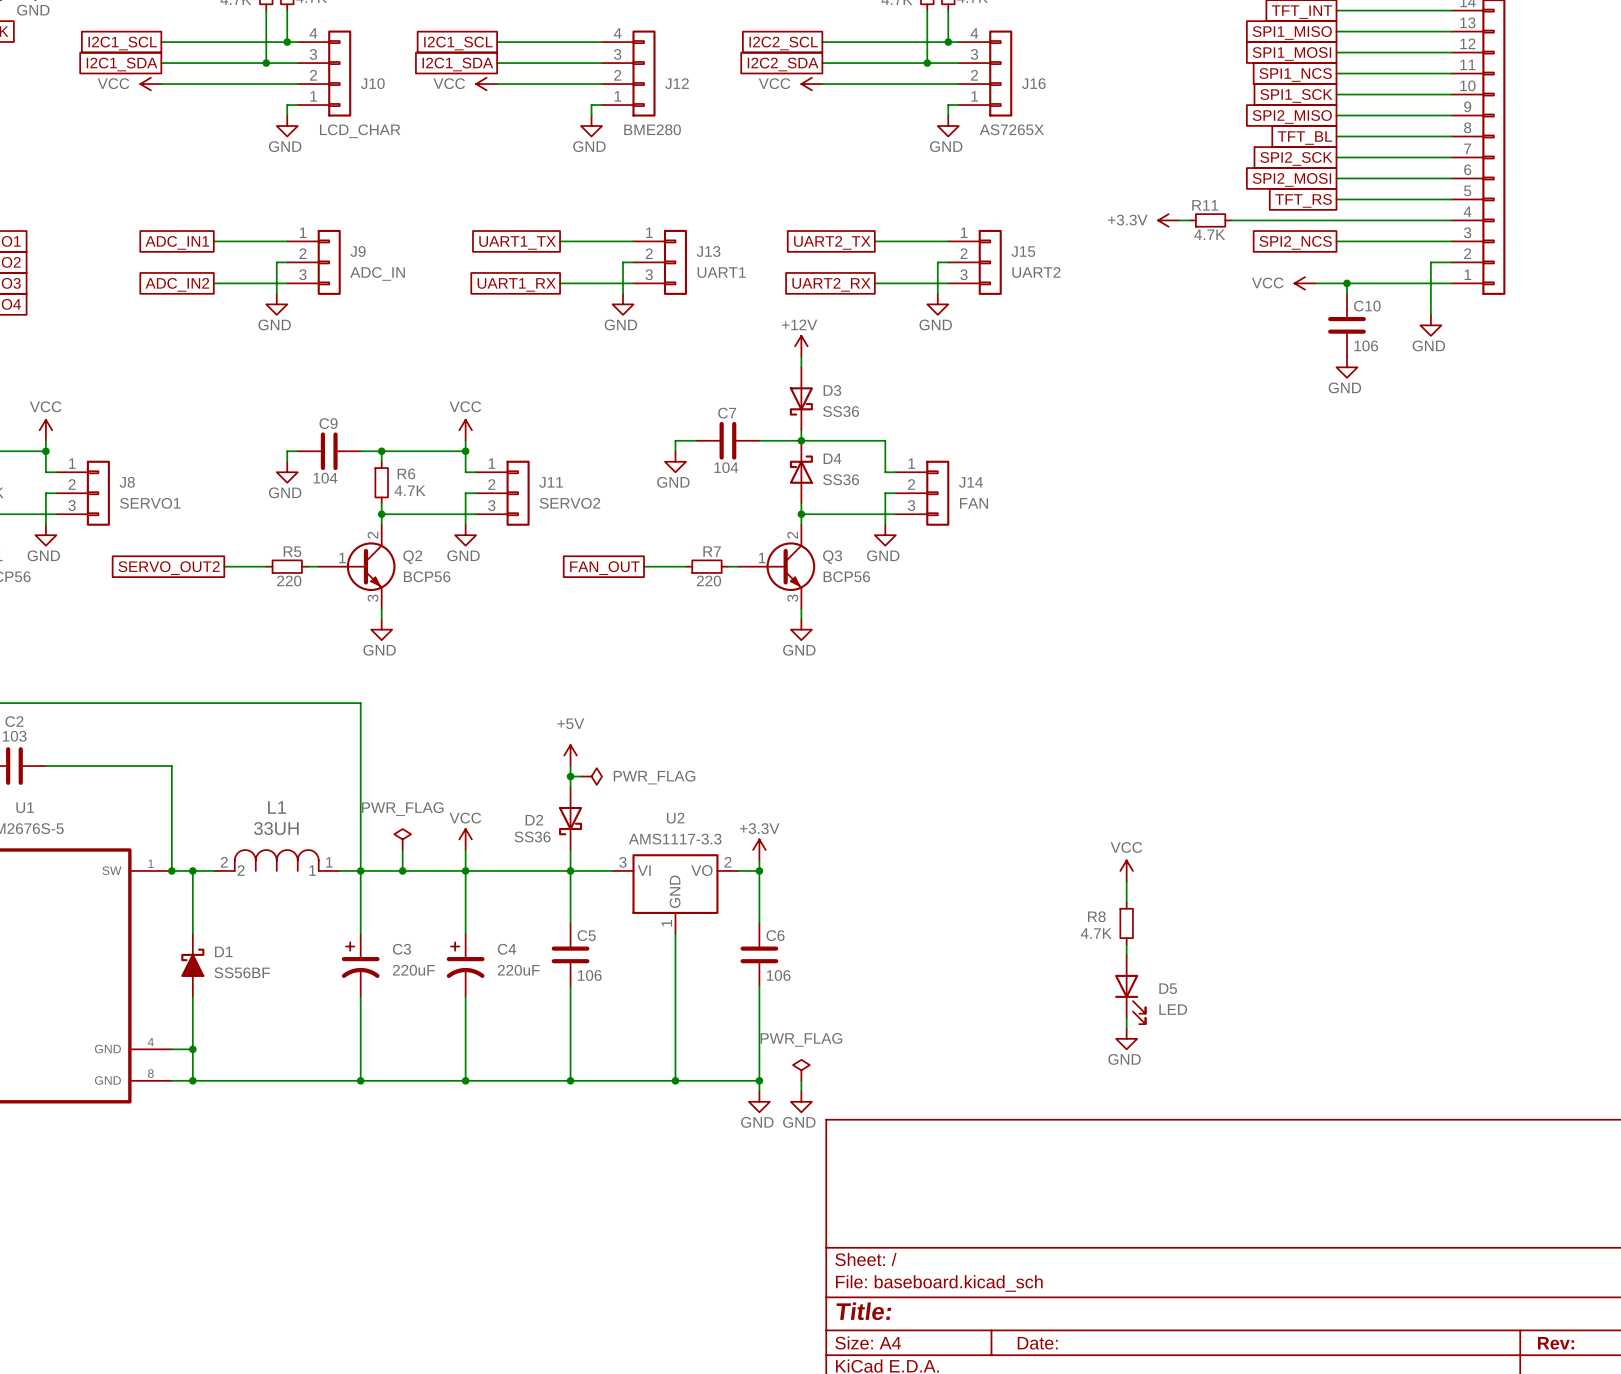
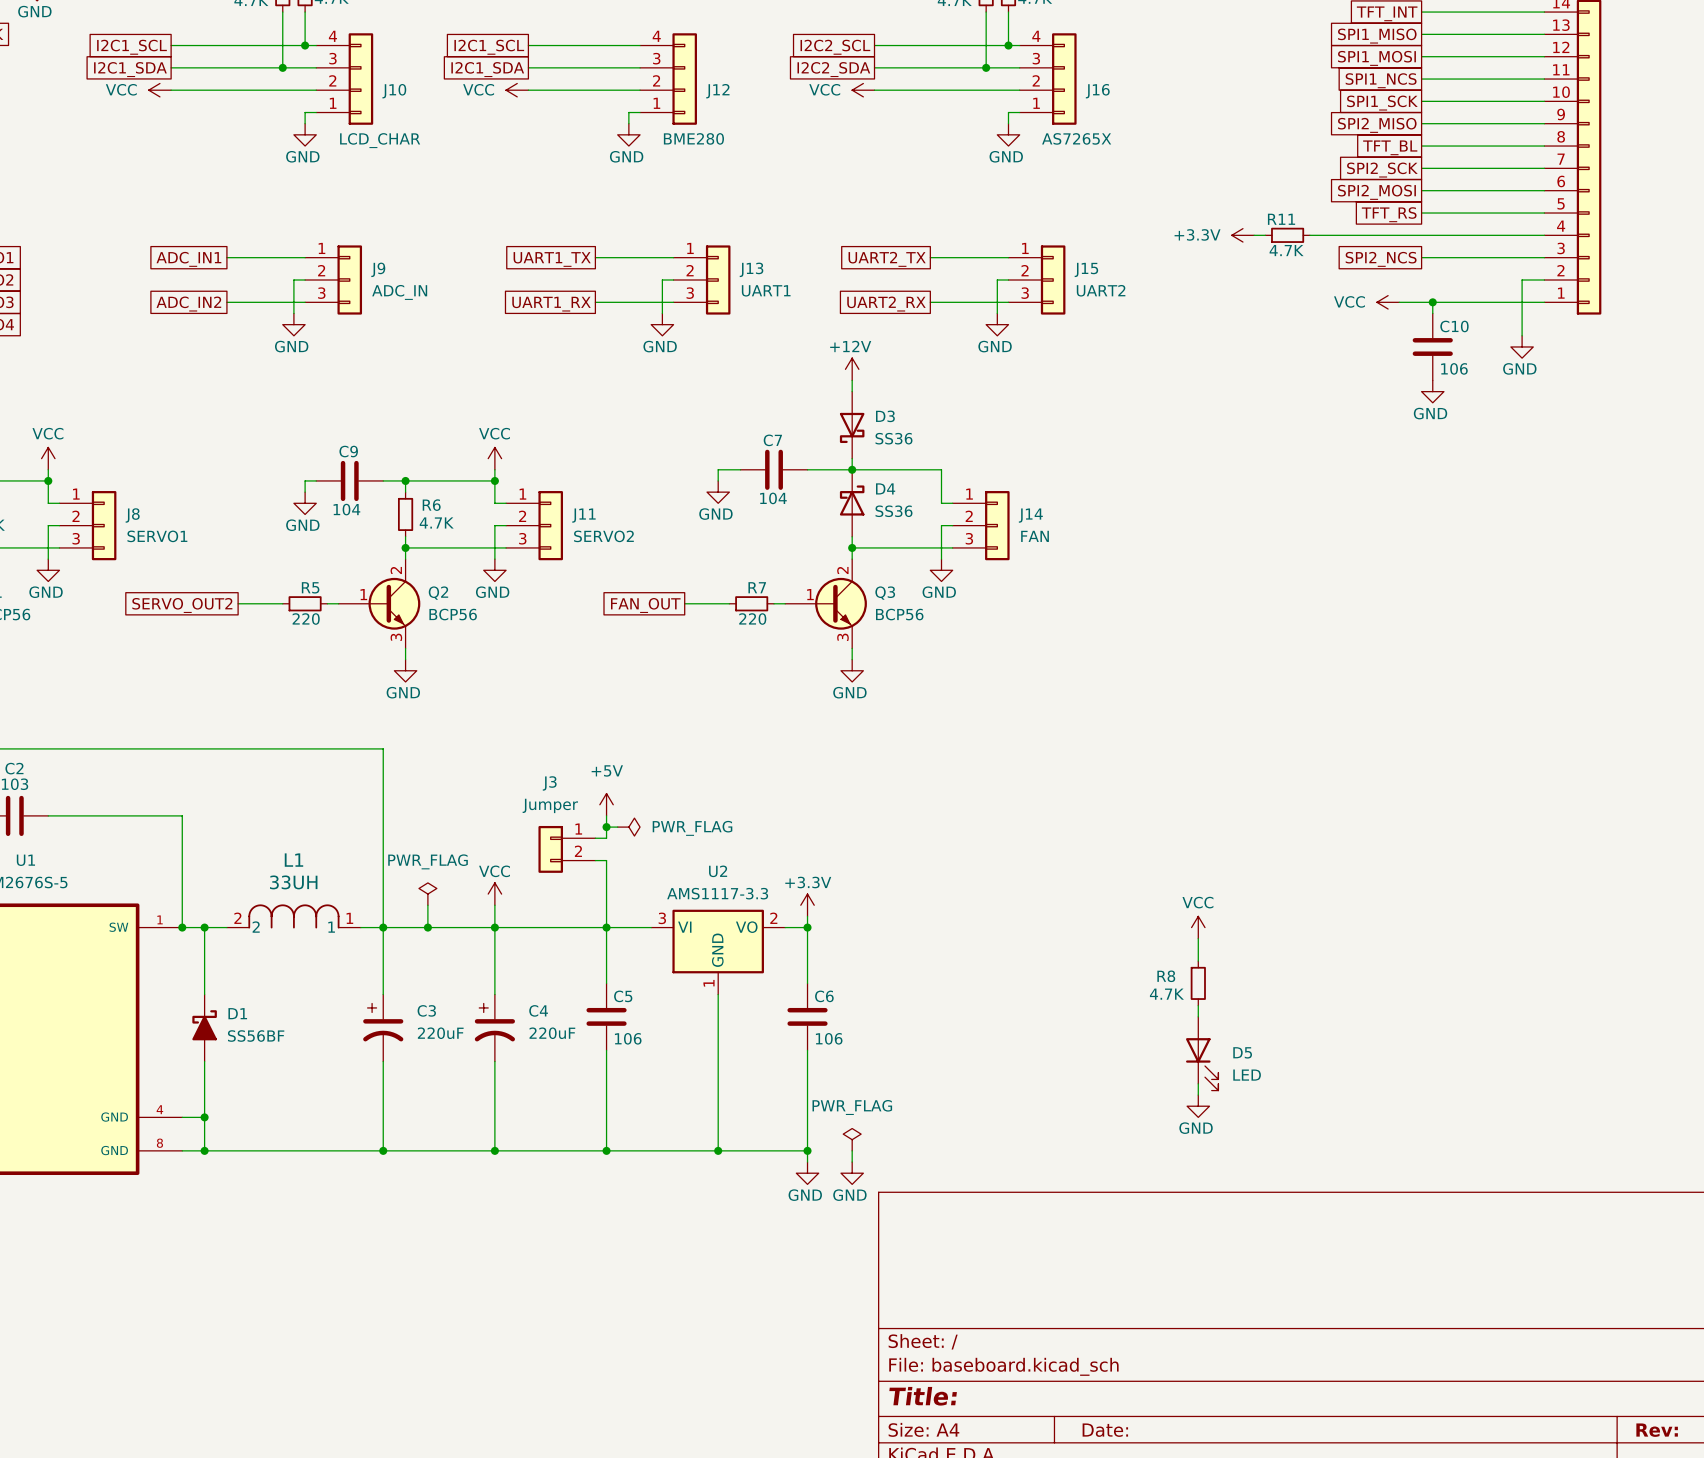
wire: none -> (595, 838) (606, 838)
J3: none -> Jumper (566, 849)
D2: SS36 (570, 818) -> none

